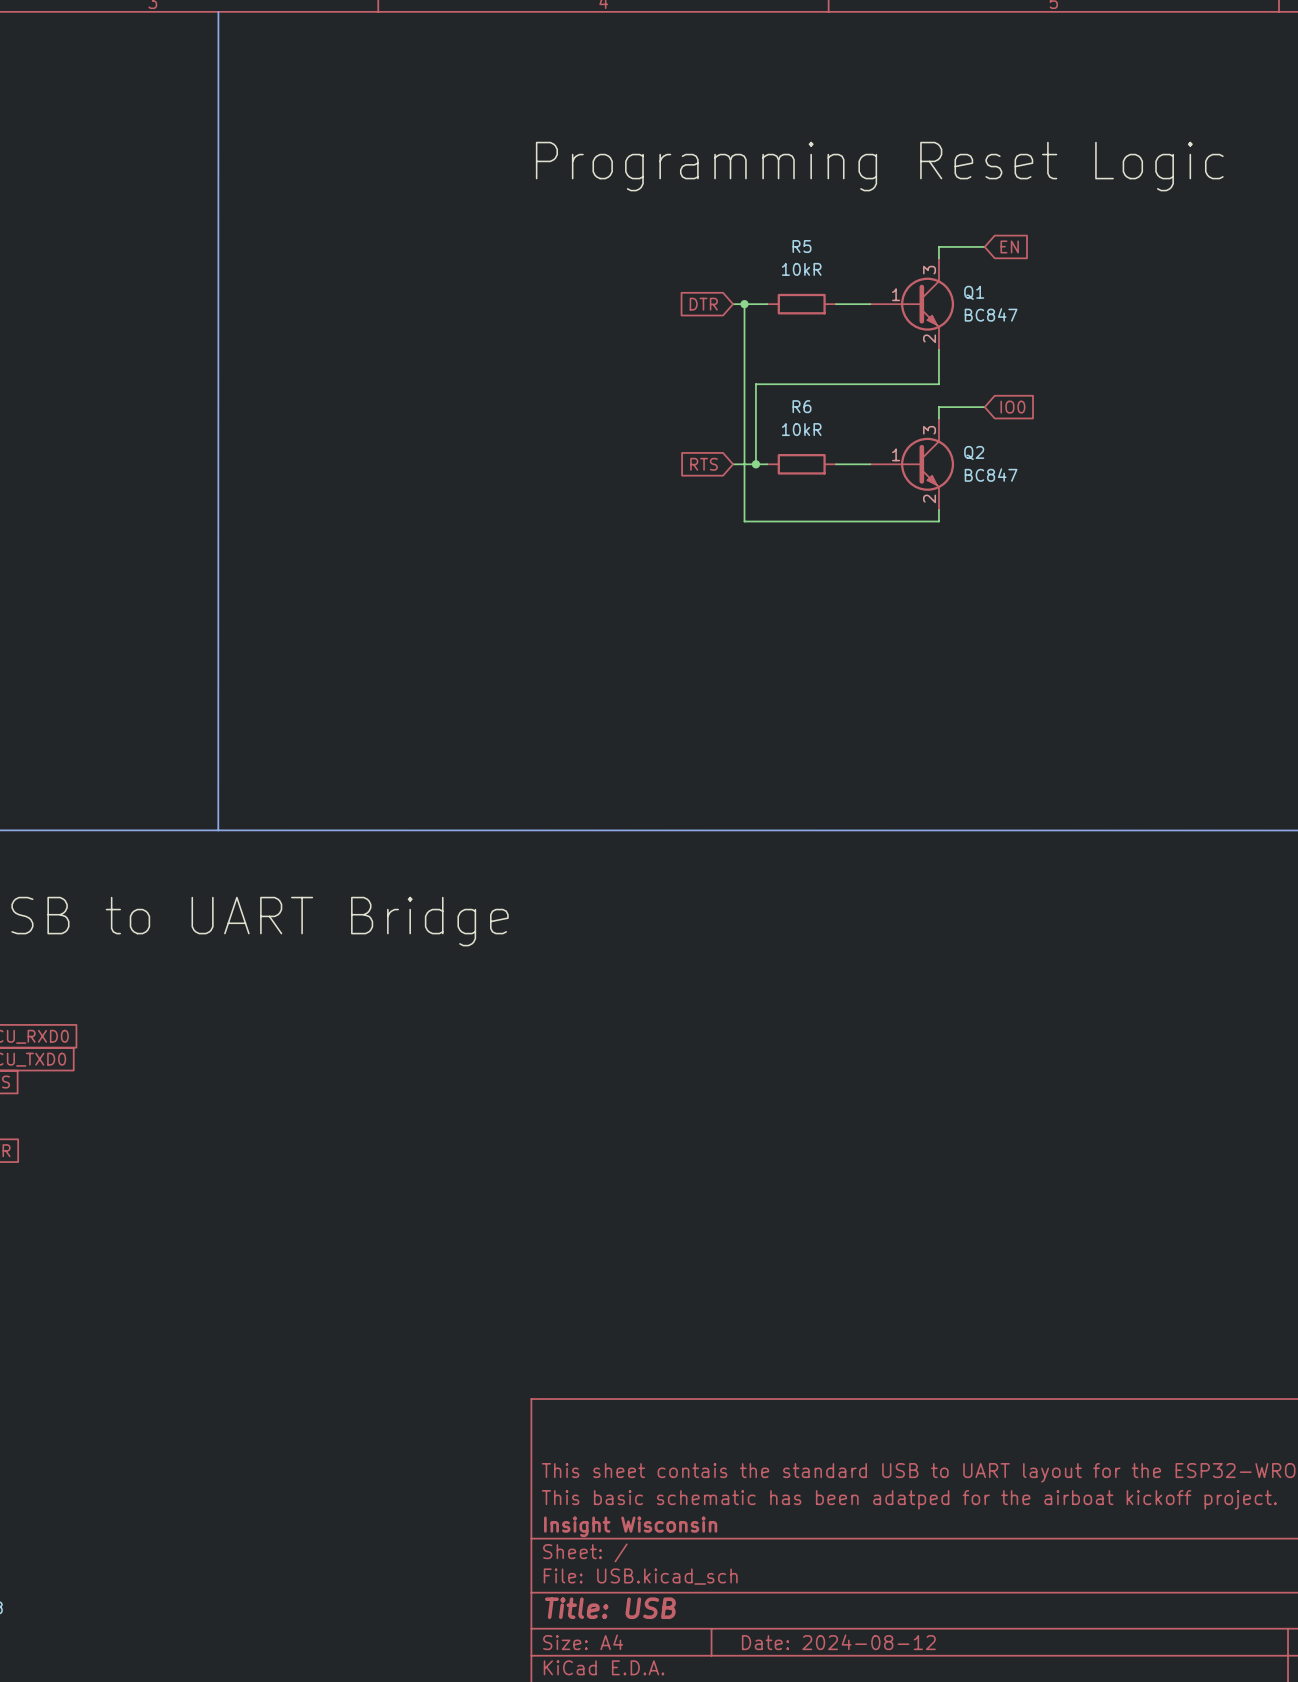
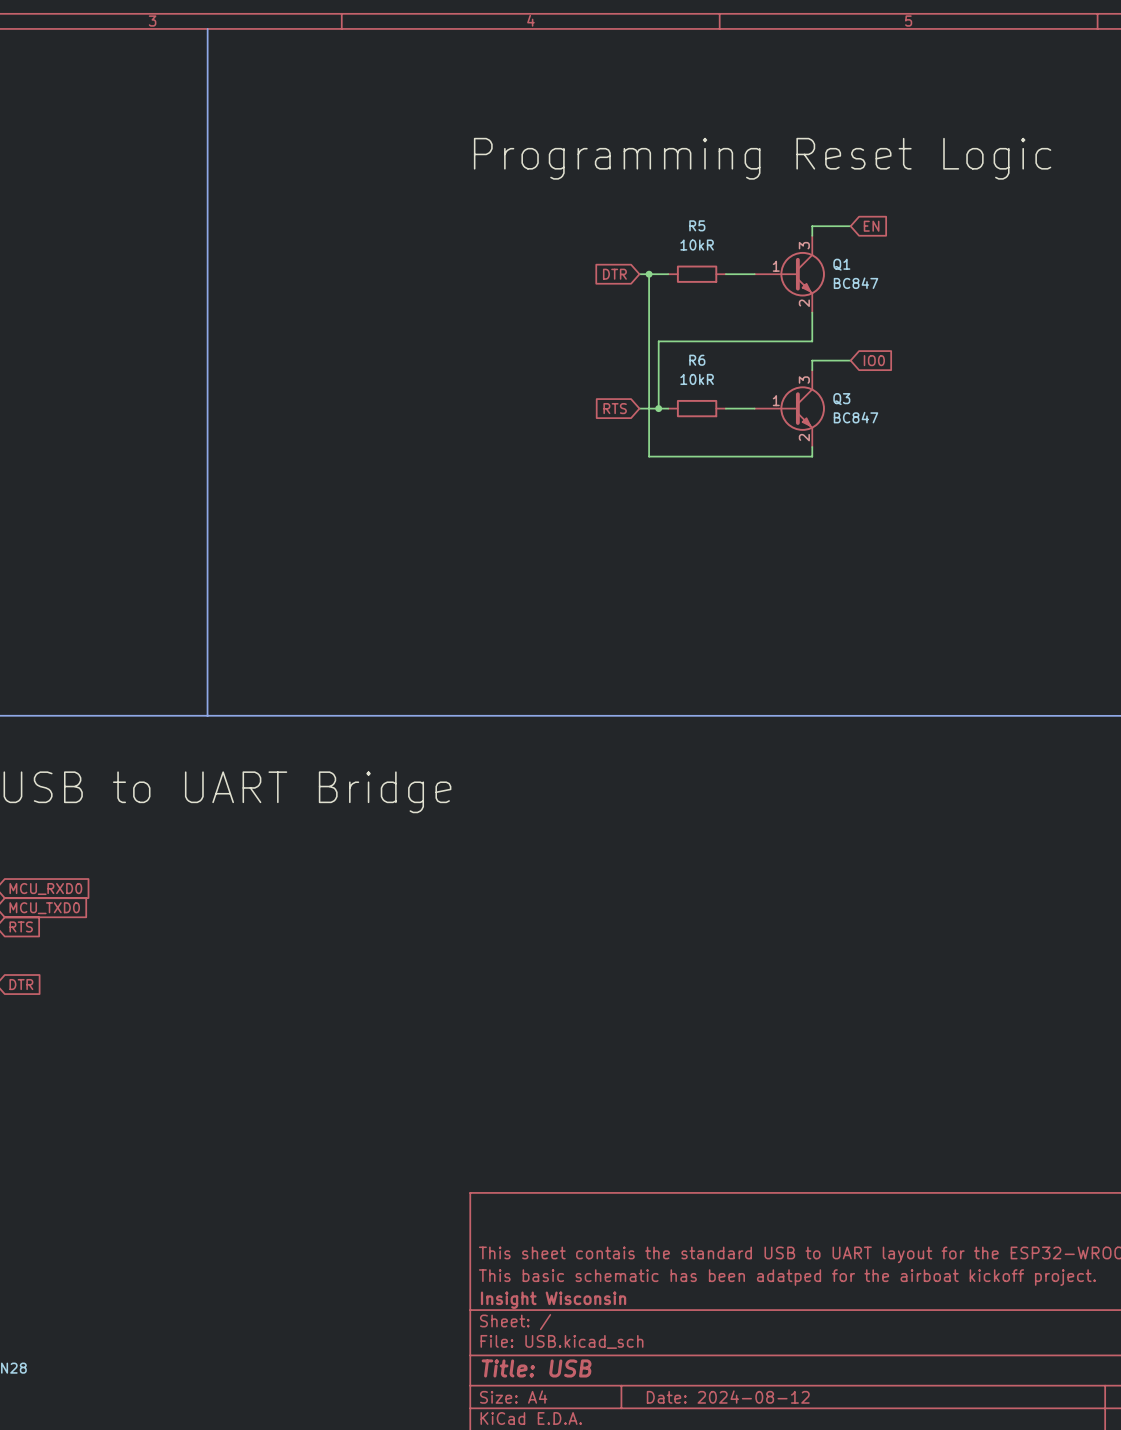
Q2 name: Q2 (974, 452) -> Q3 (841, 399)

